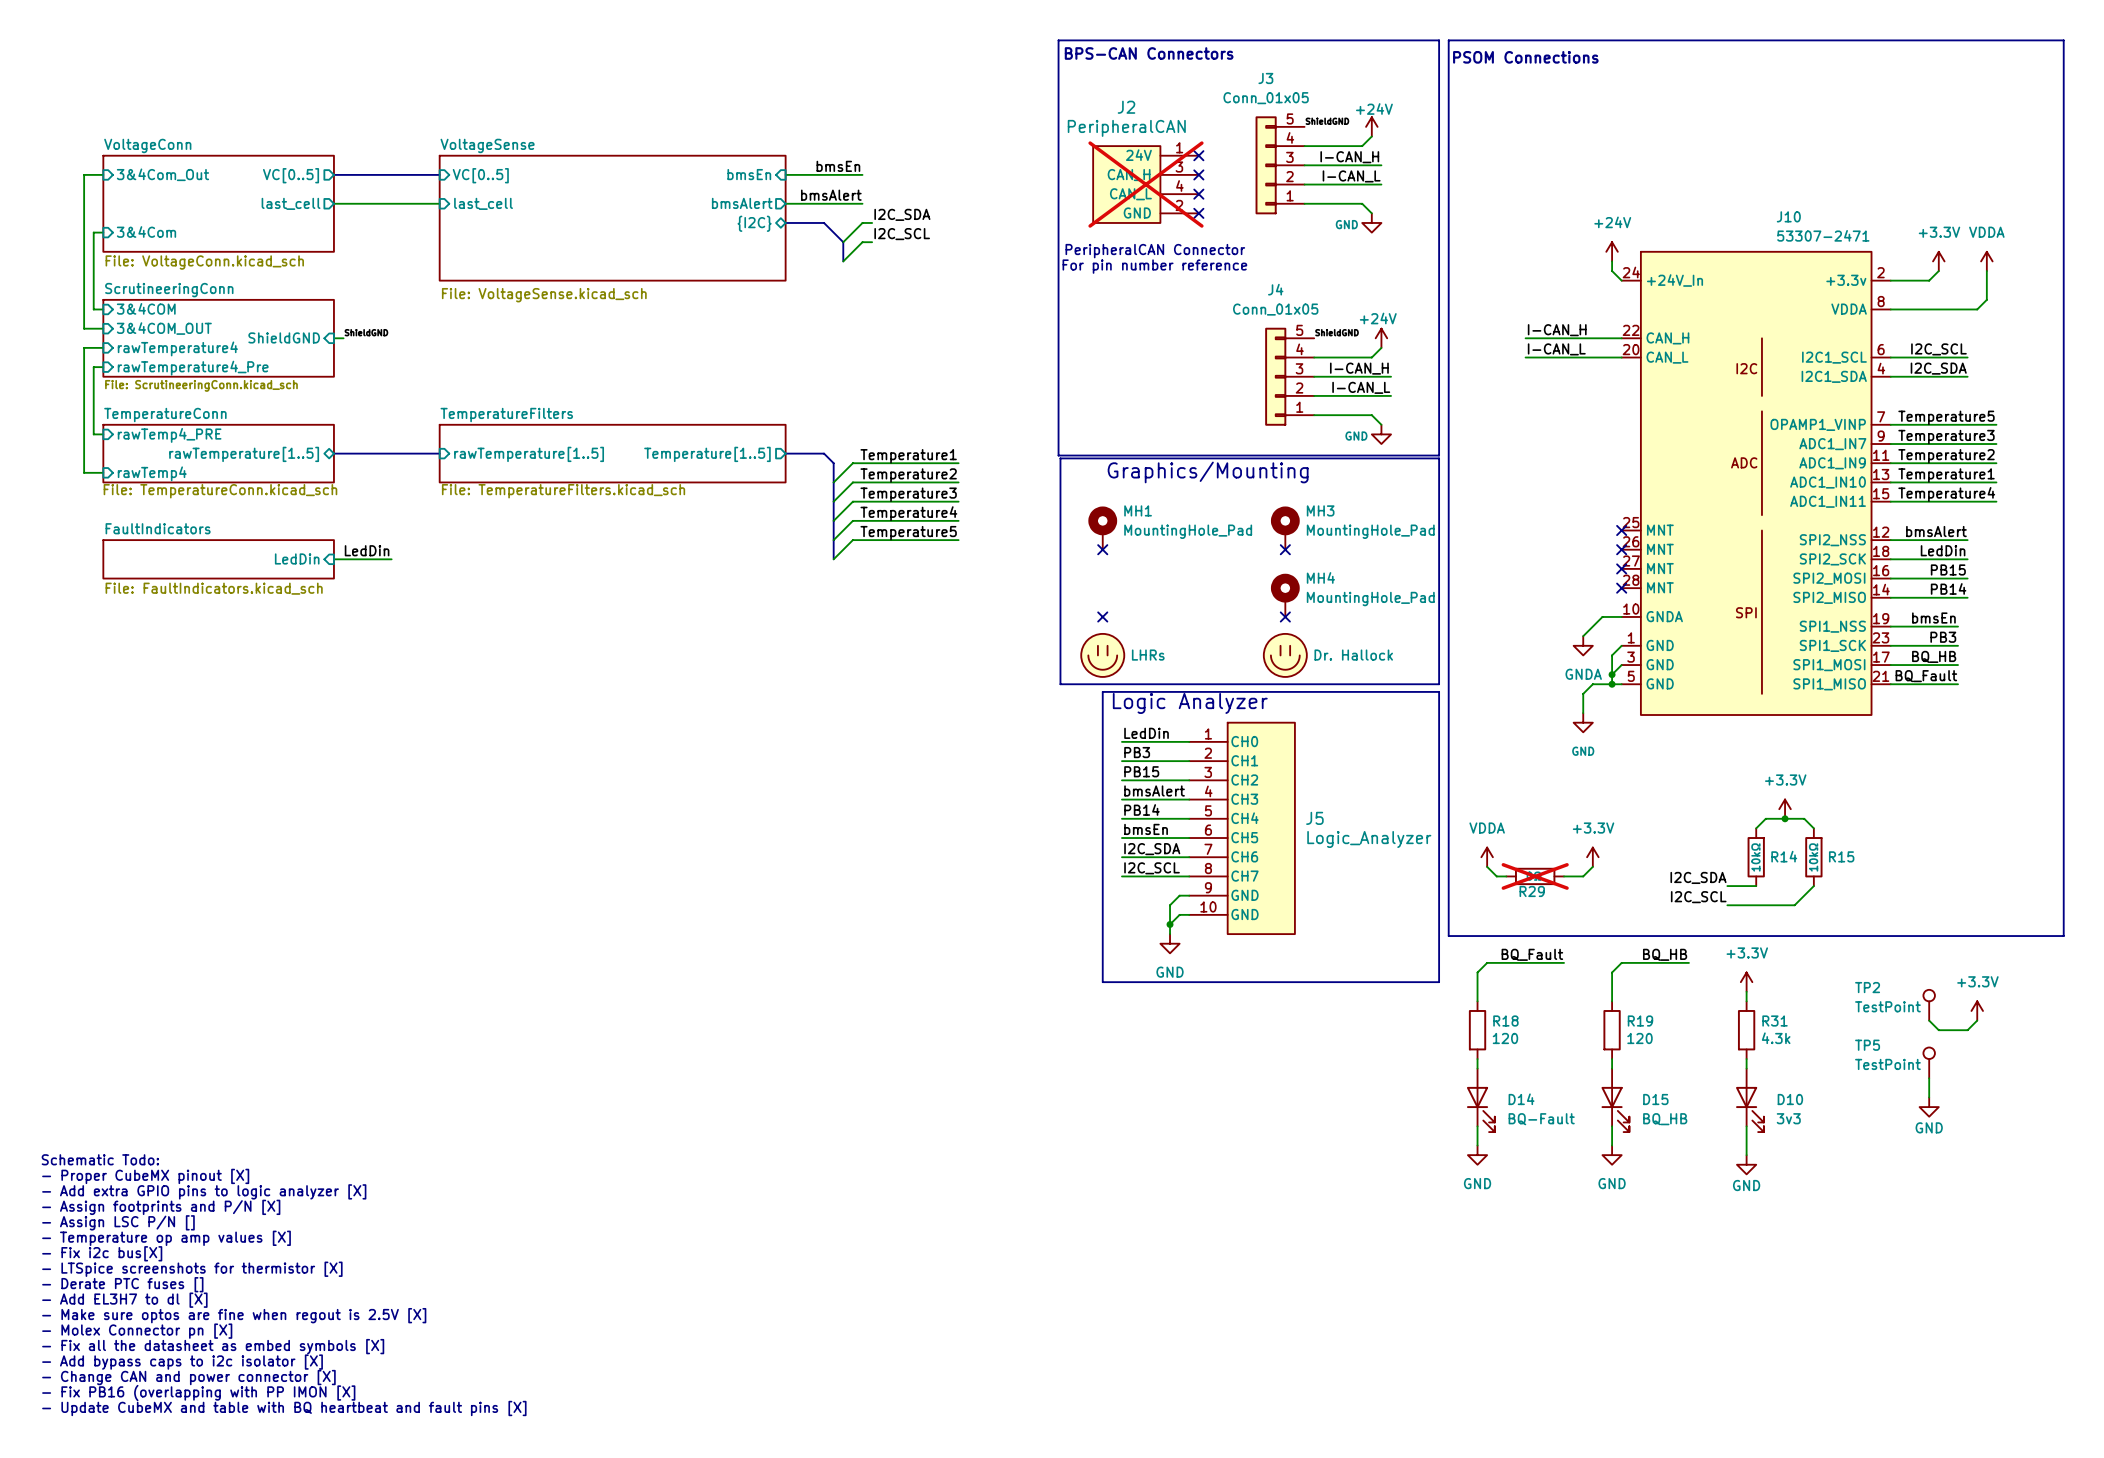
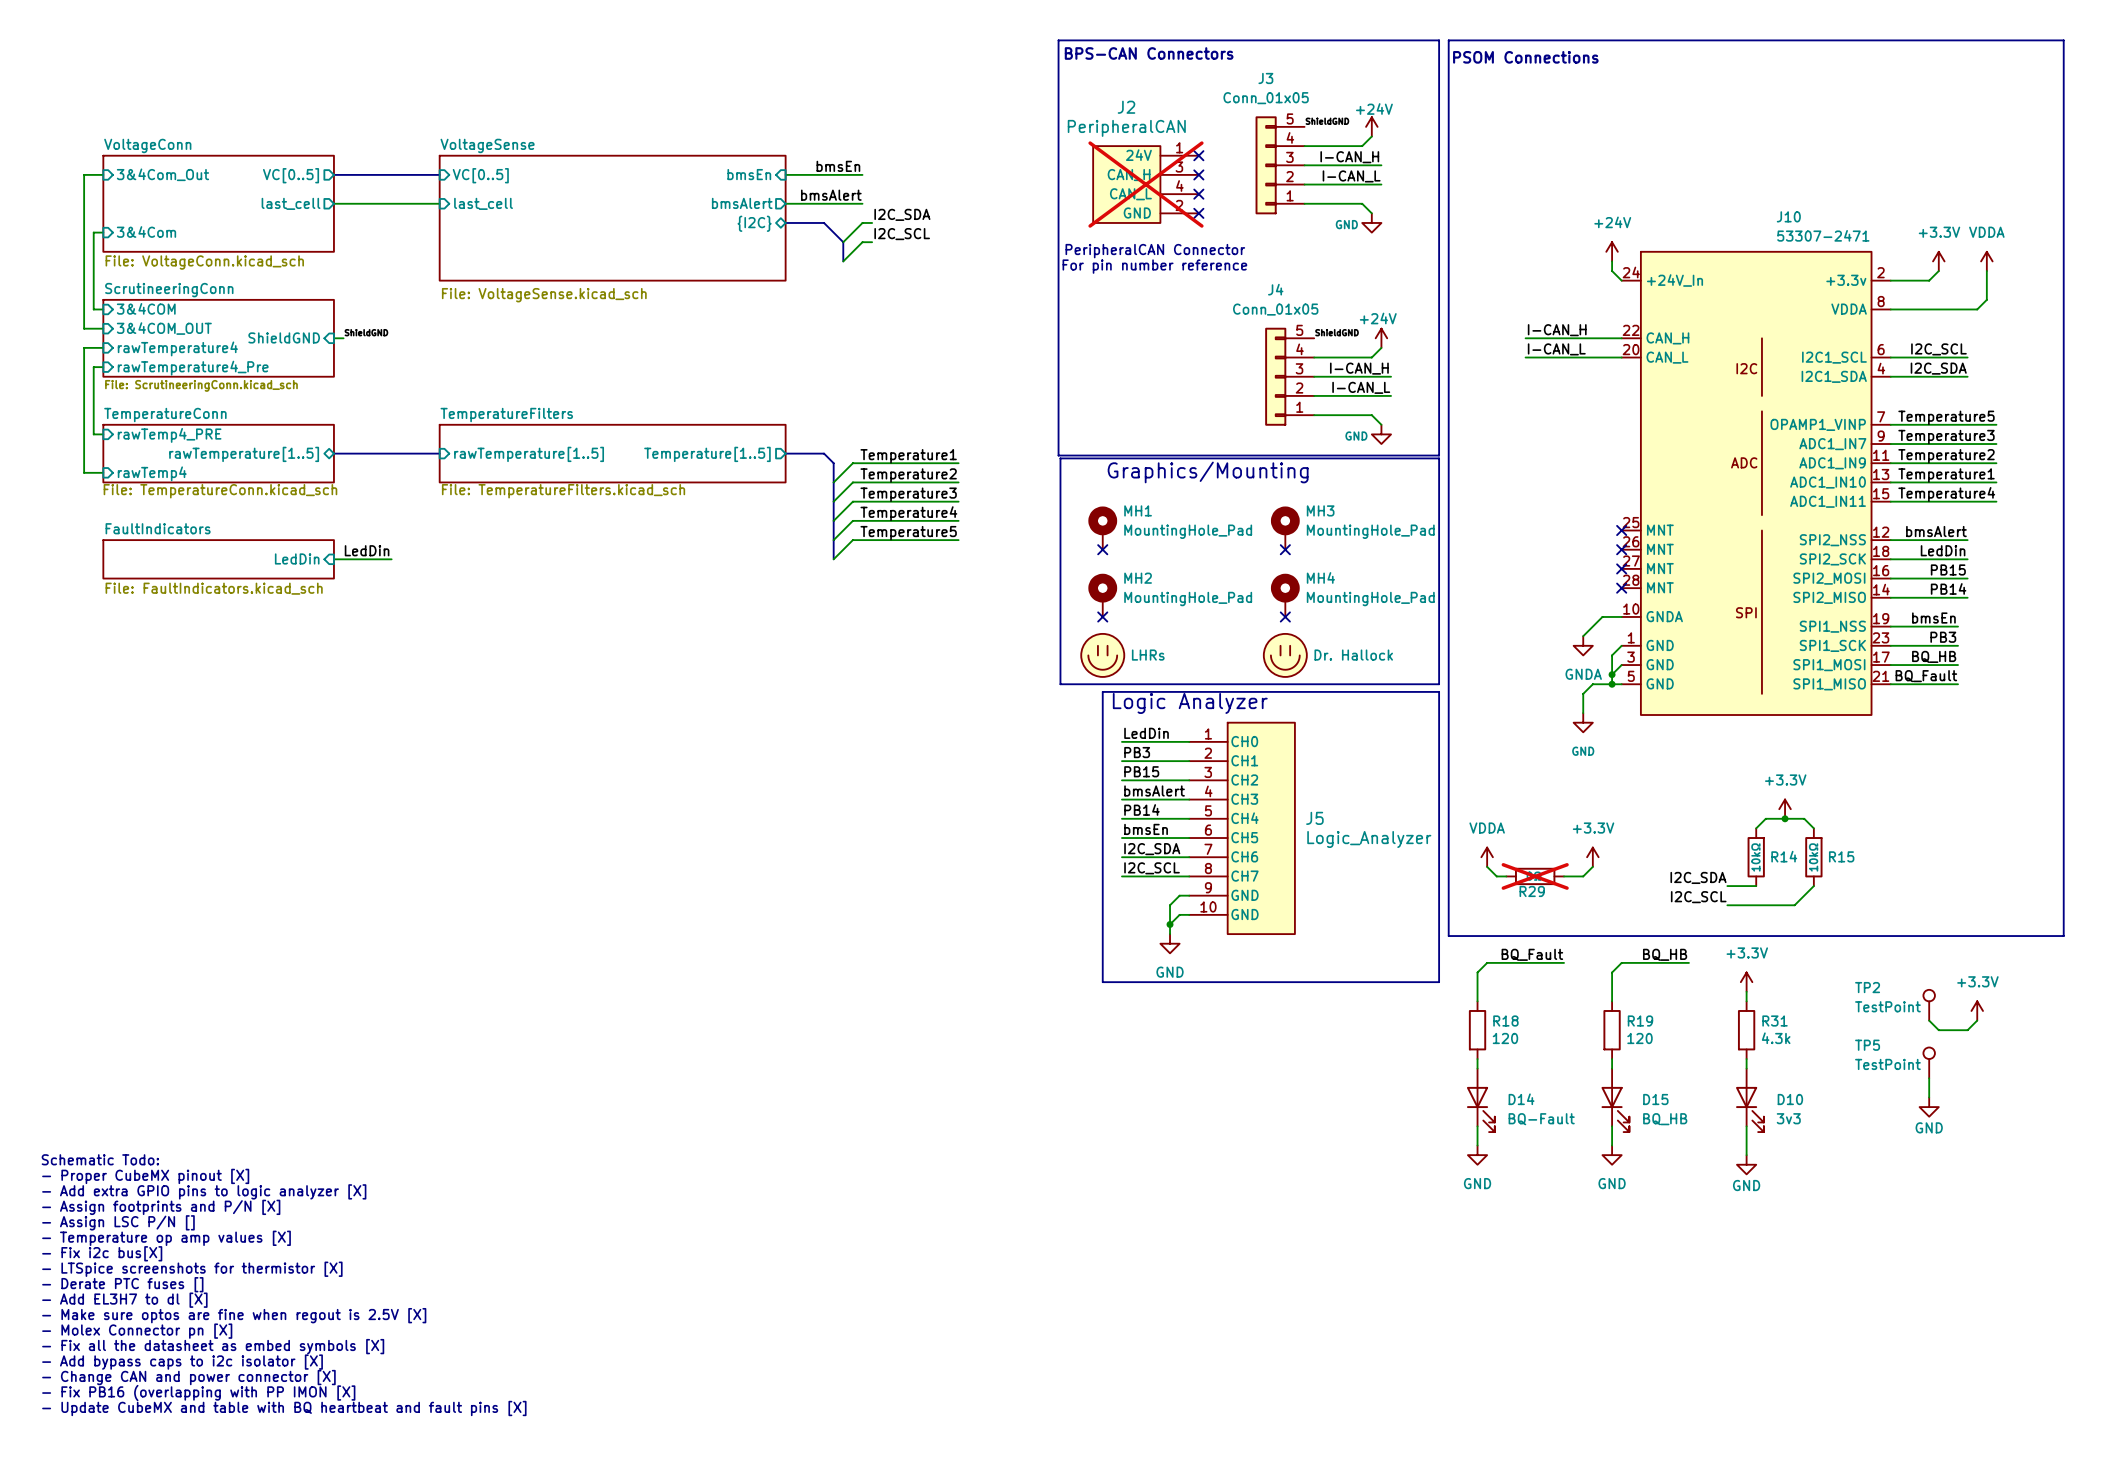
MH2: none -> MountingHole_Pad (1102, 595)

